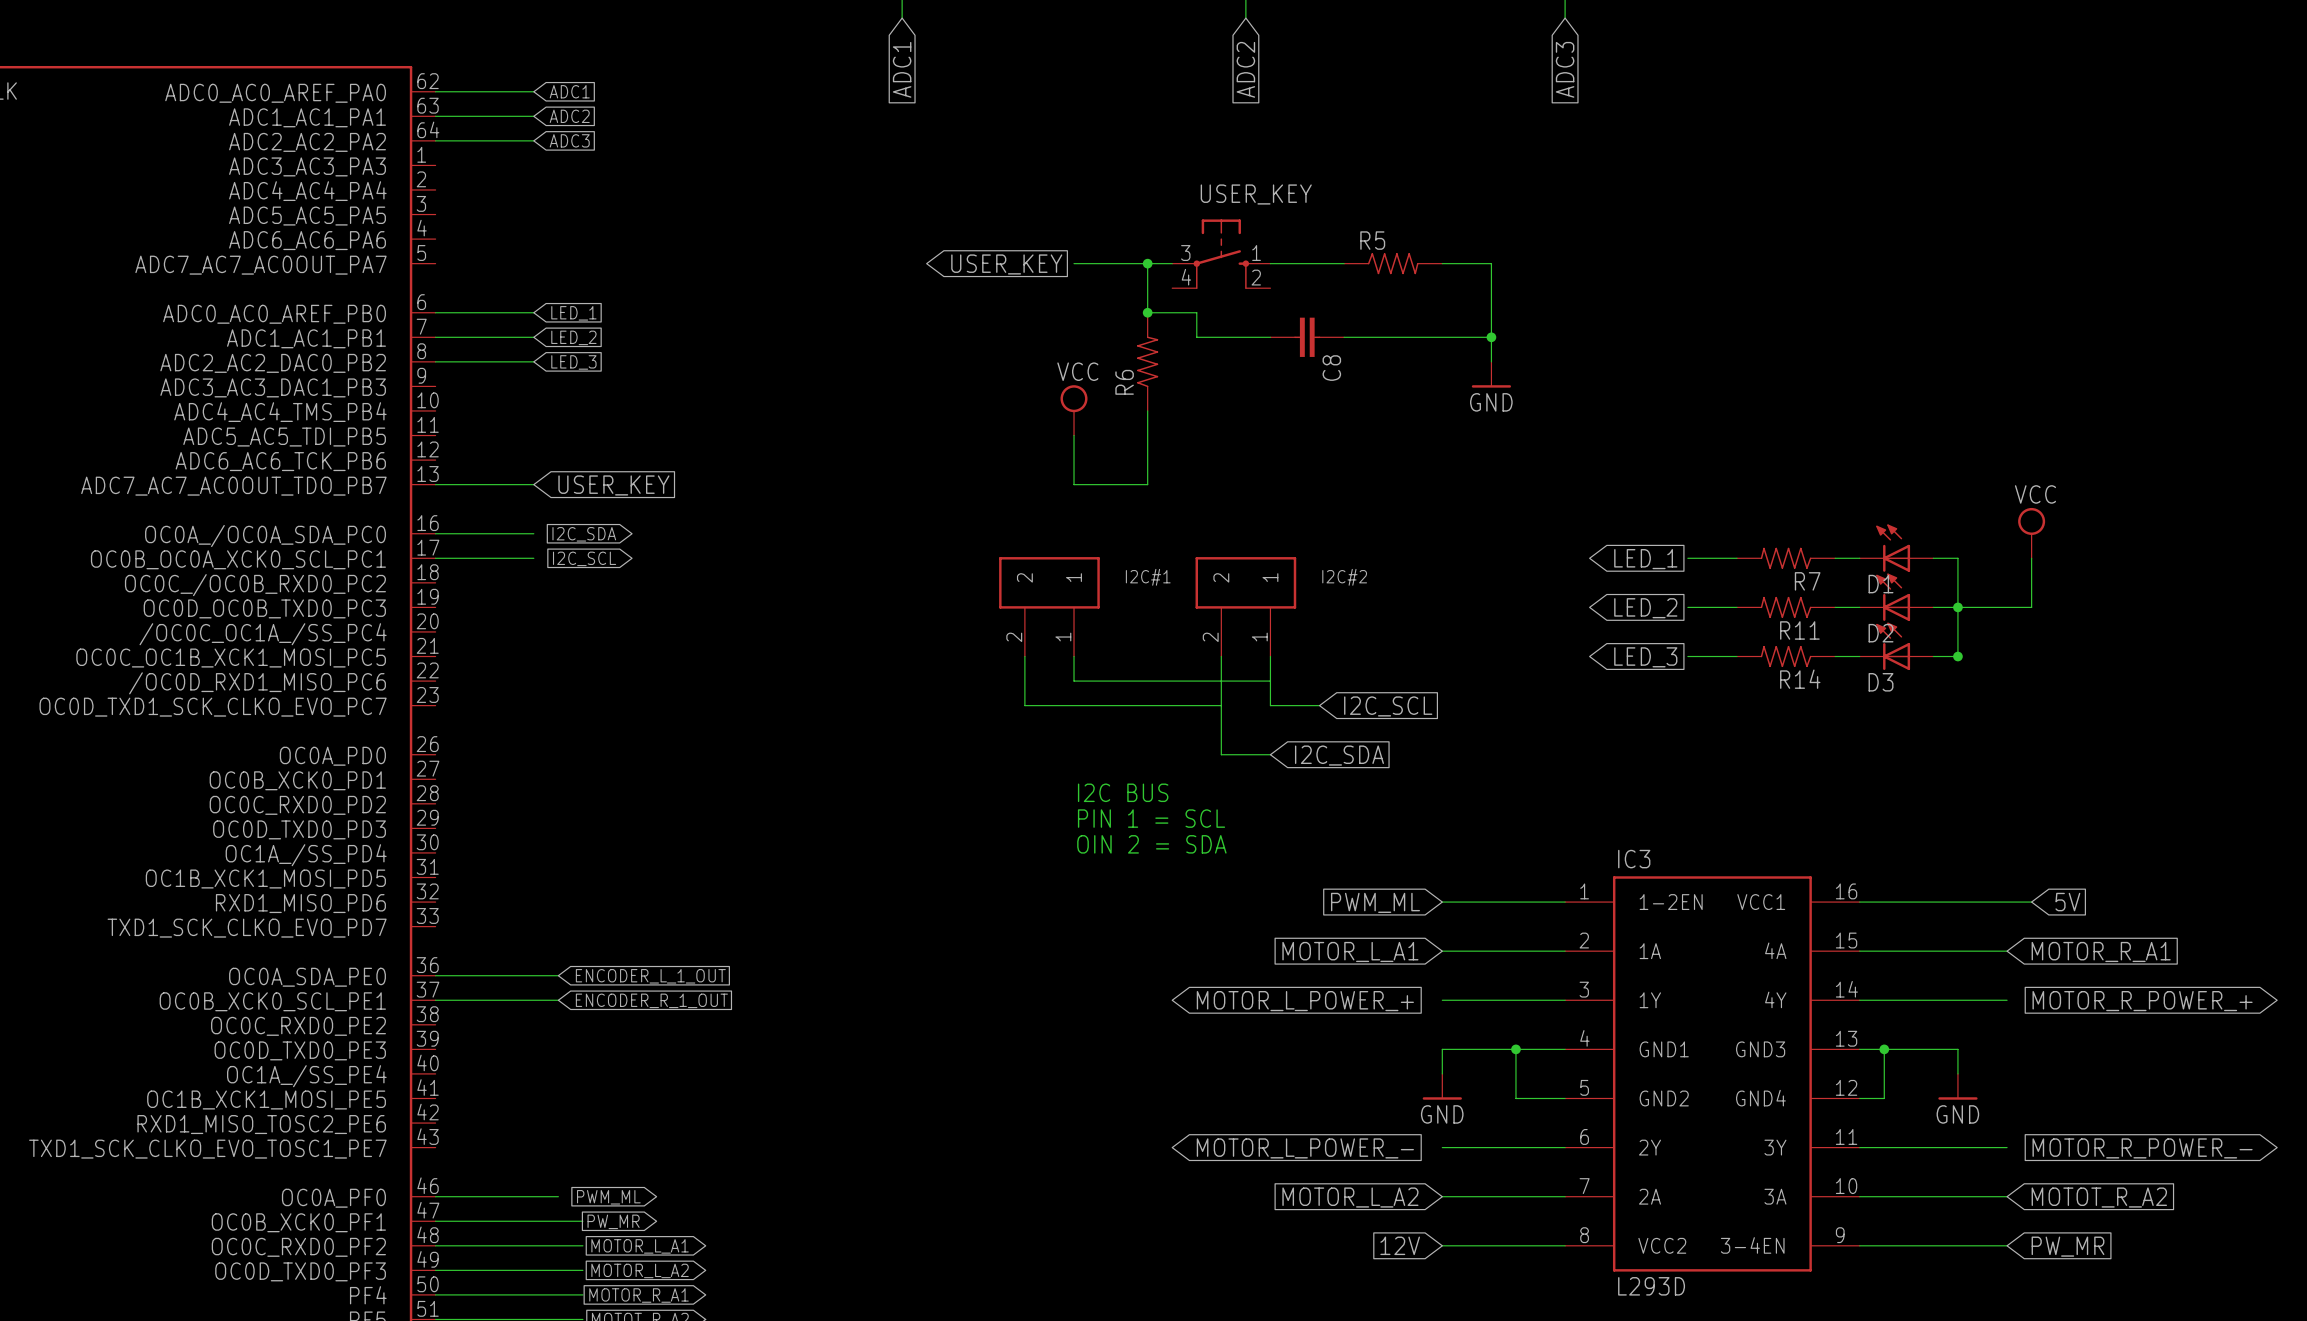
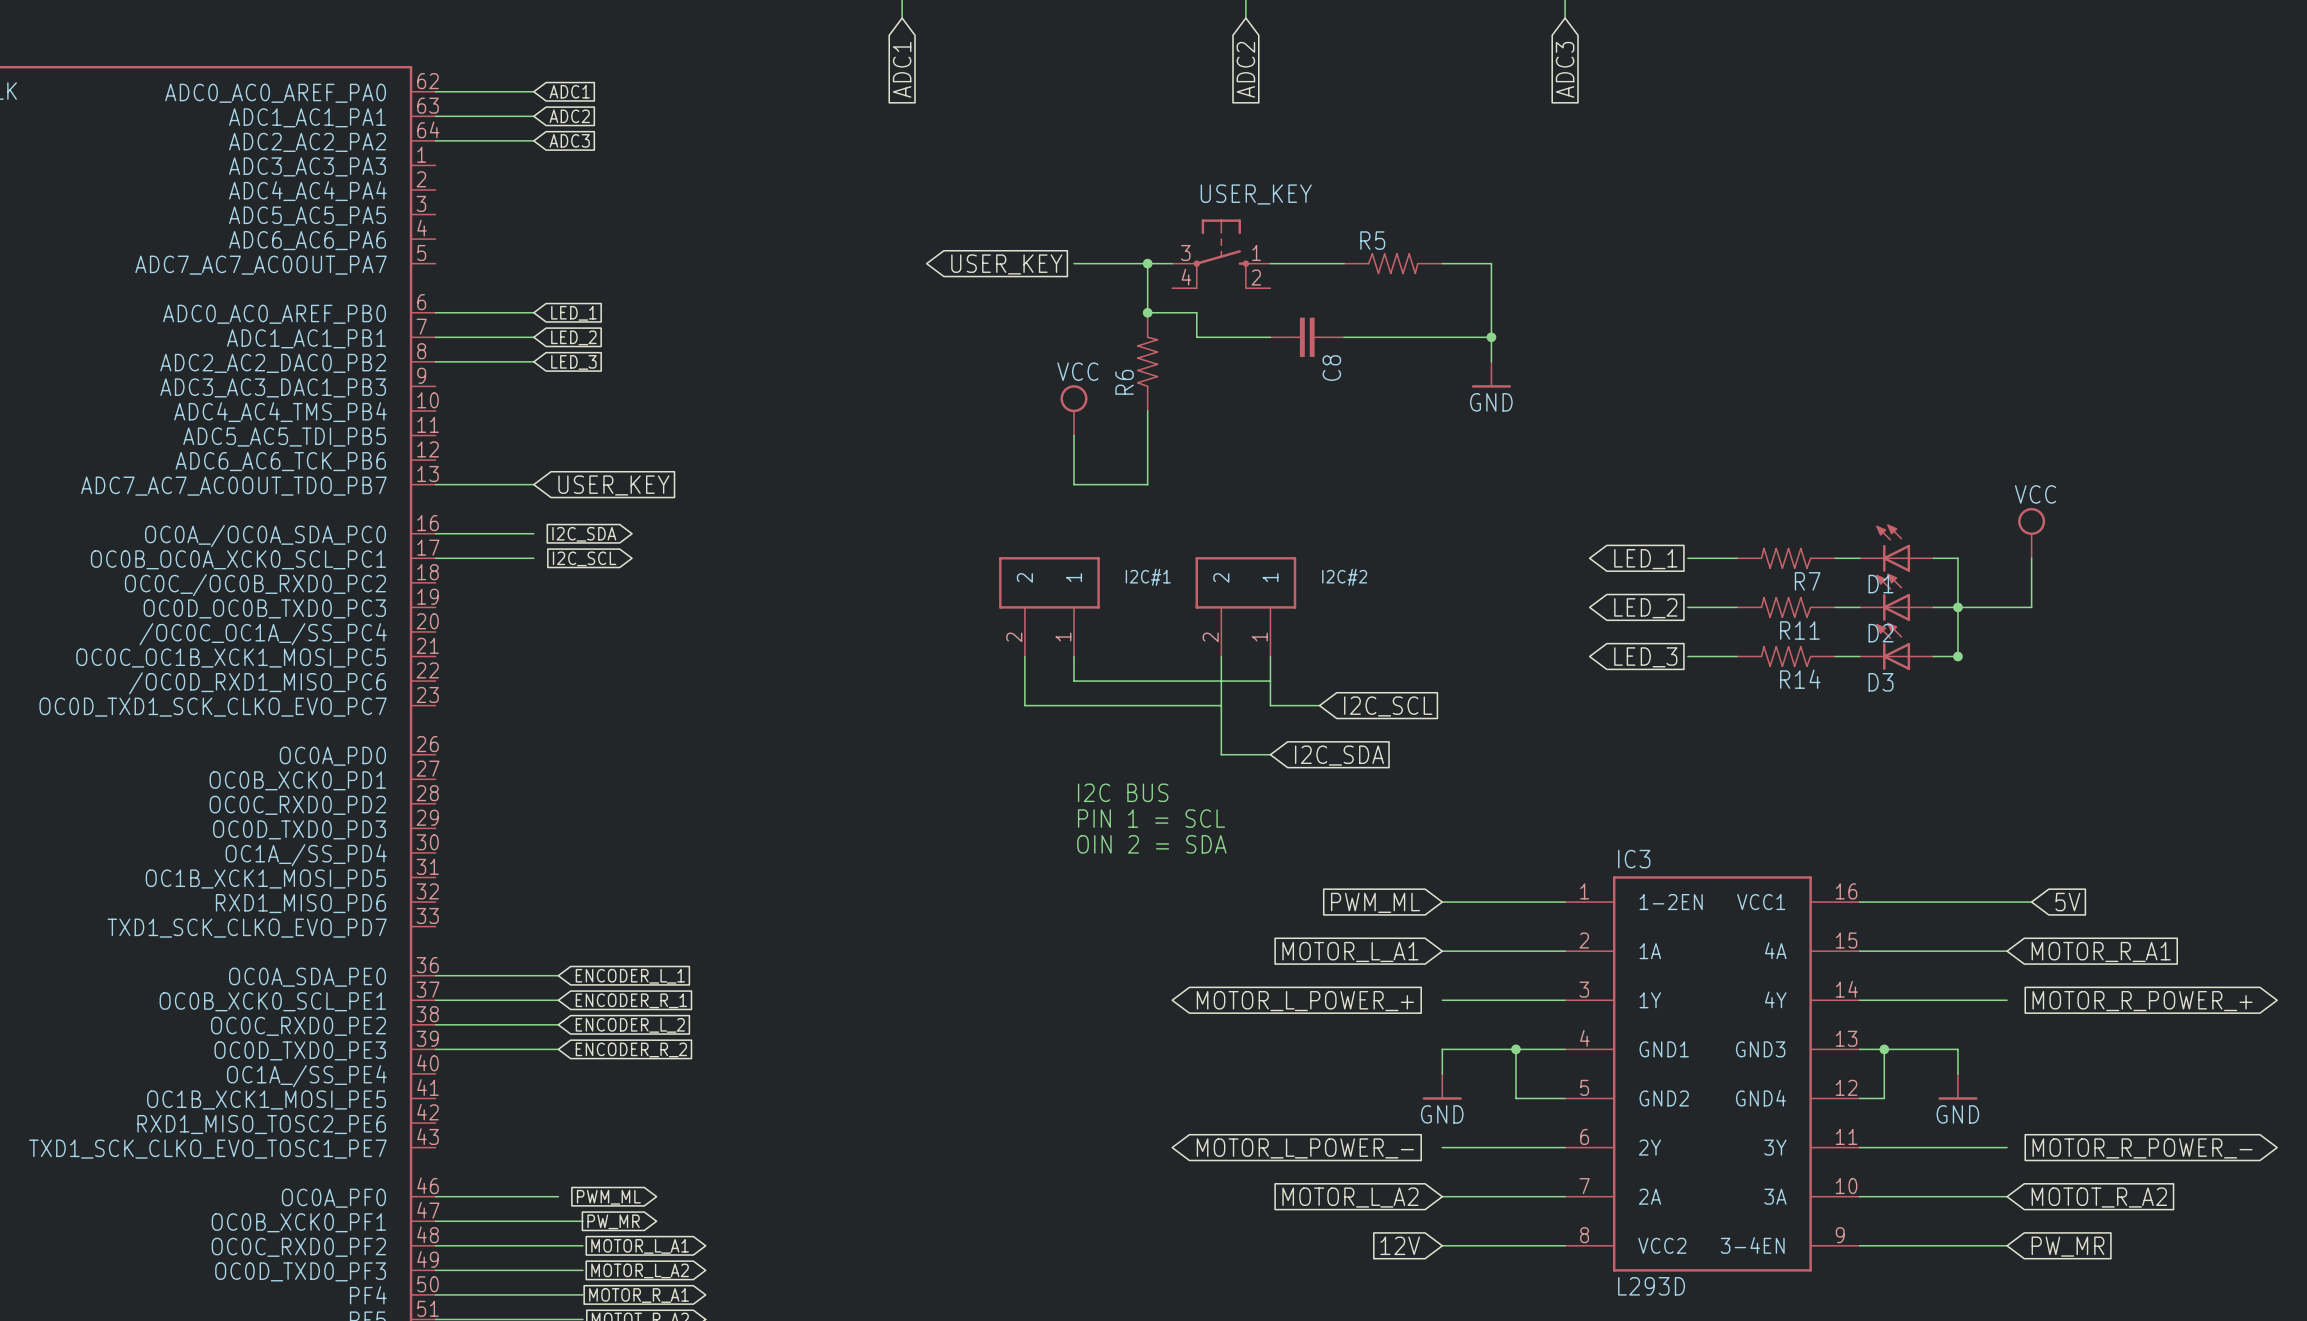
global label: ENCODER_L_1_OUT (650, 976) -> ENCODER_L_1 (630, 976)
global label: ENCODER_R_1_OUT (651, 1000) -> ENCODER_R_1 (631, 1000)
wire: none -> (435, 1024) (558, 1024)
global label: none -> ENCODER_L_2 (630, 1025)
wire: none -> (435, 1049) (558, 1049)
global label: none -> ENCODER_R_2 (631, 1049)

